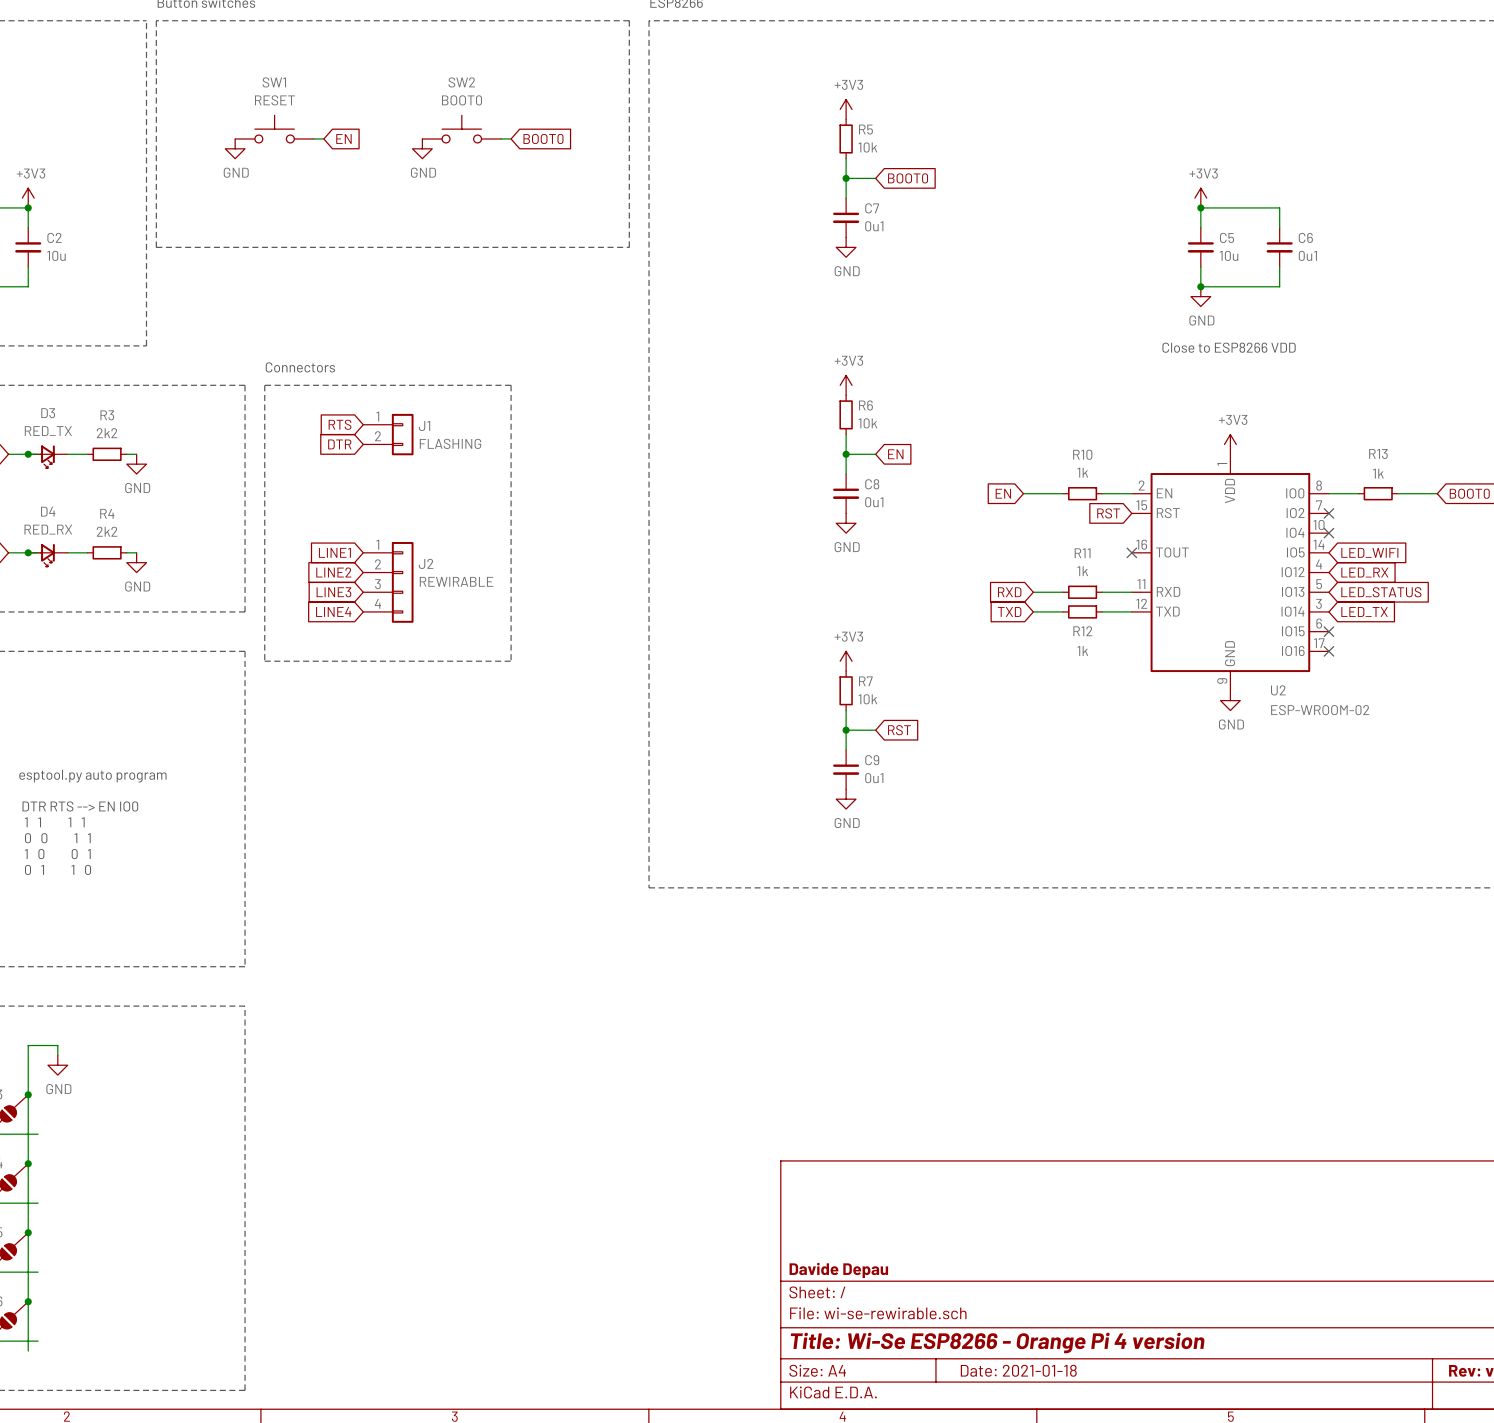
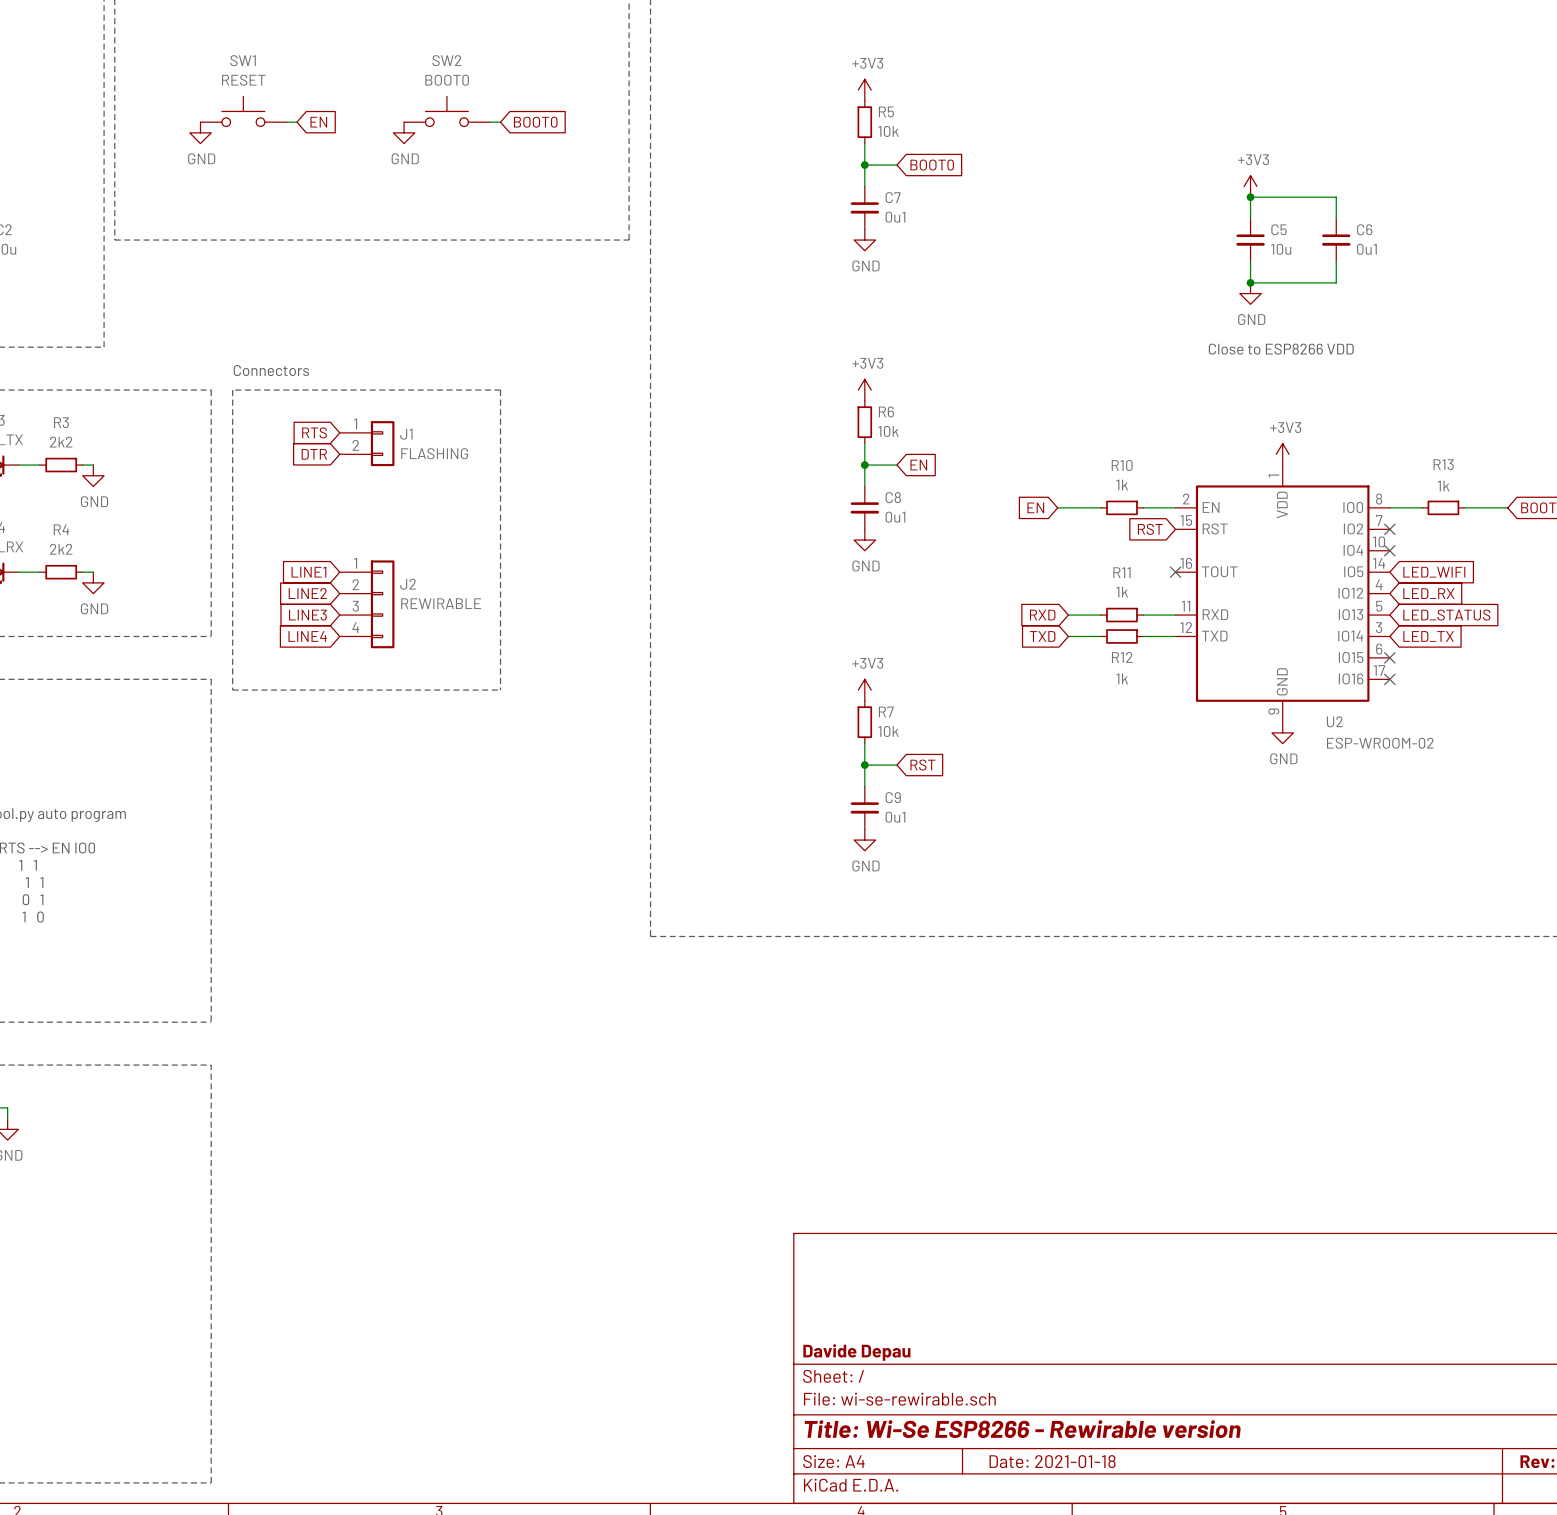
title block: Title: Wi-Se ESP8266 - Orange Pi 4 version (997, 1343) -> Title: Wi-Se ESP8266 - Rewirable version (1022, 1429)

